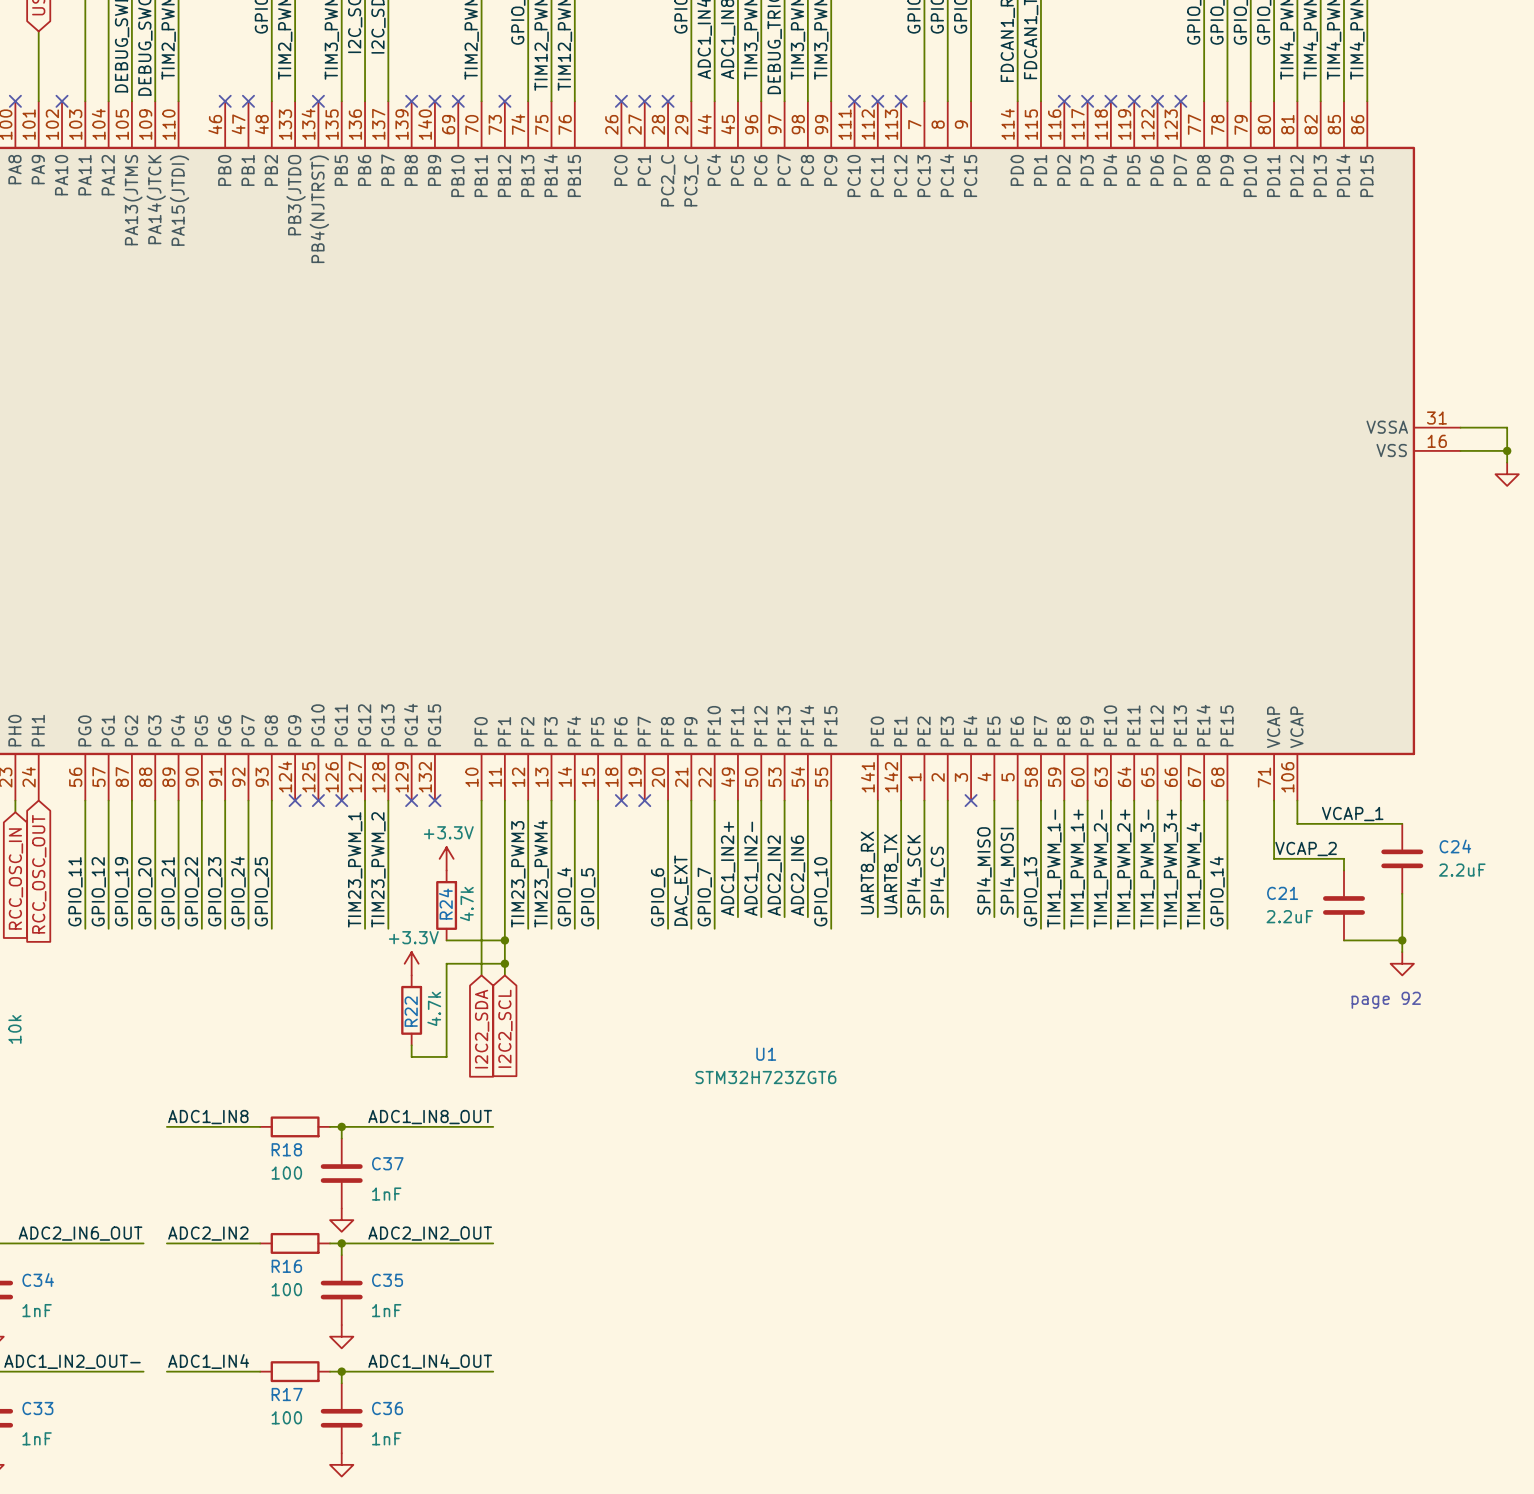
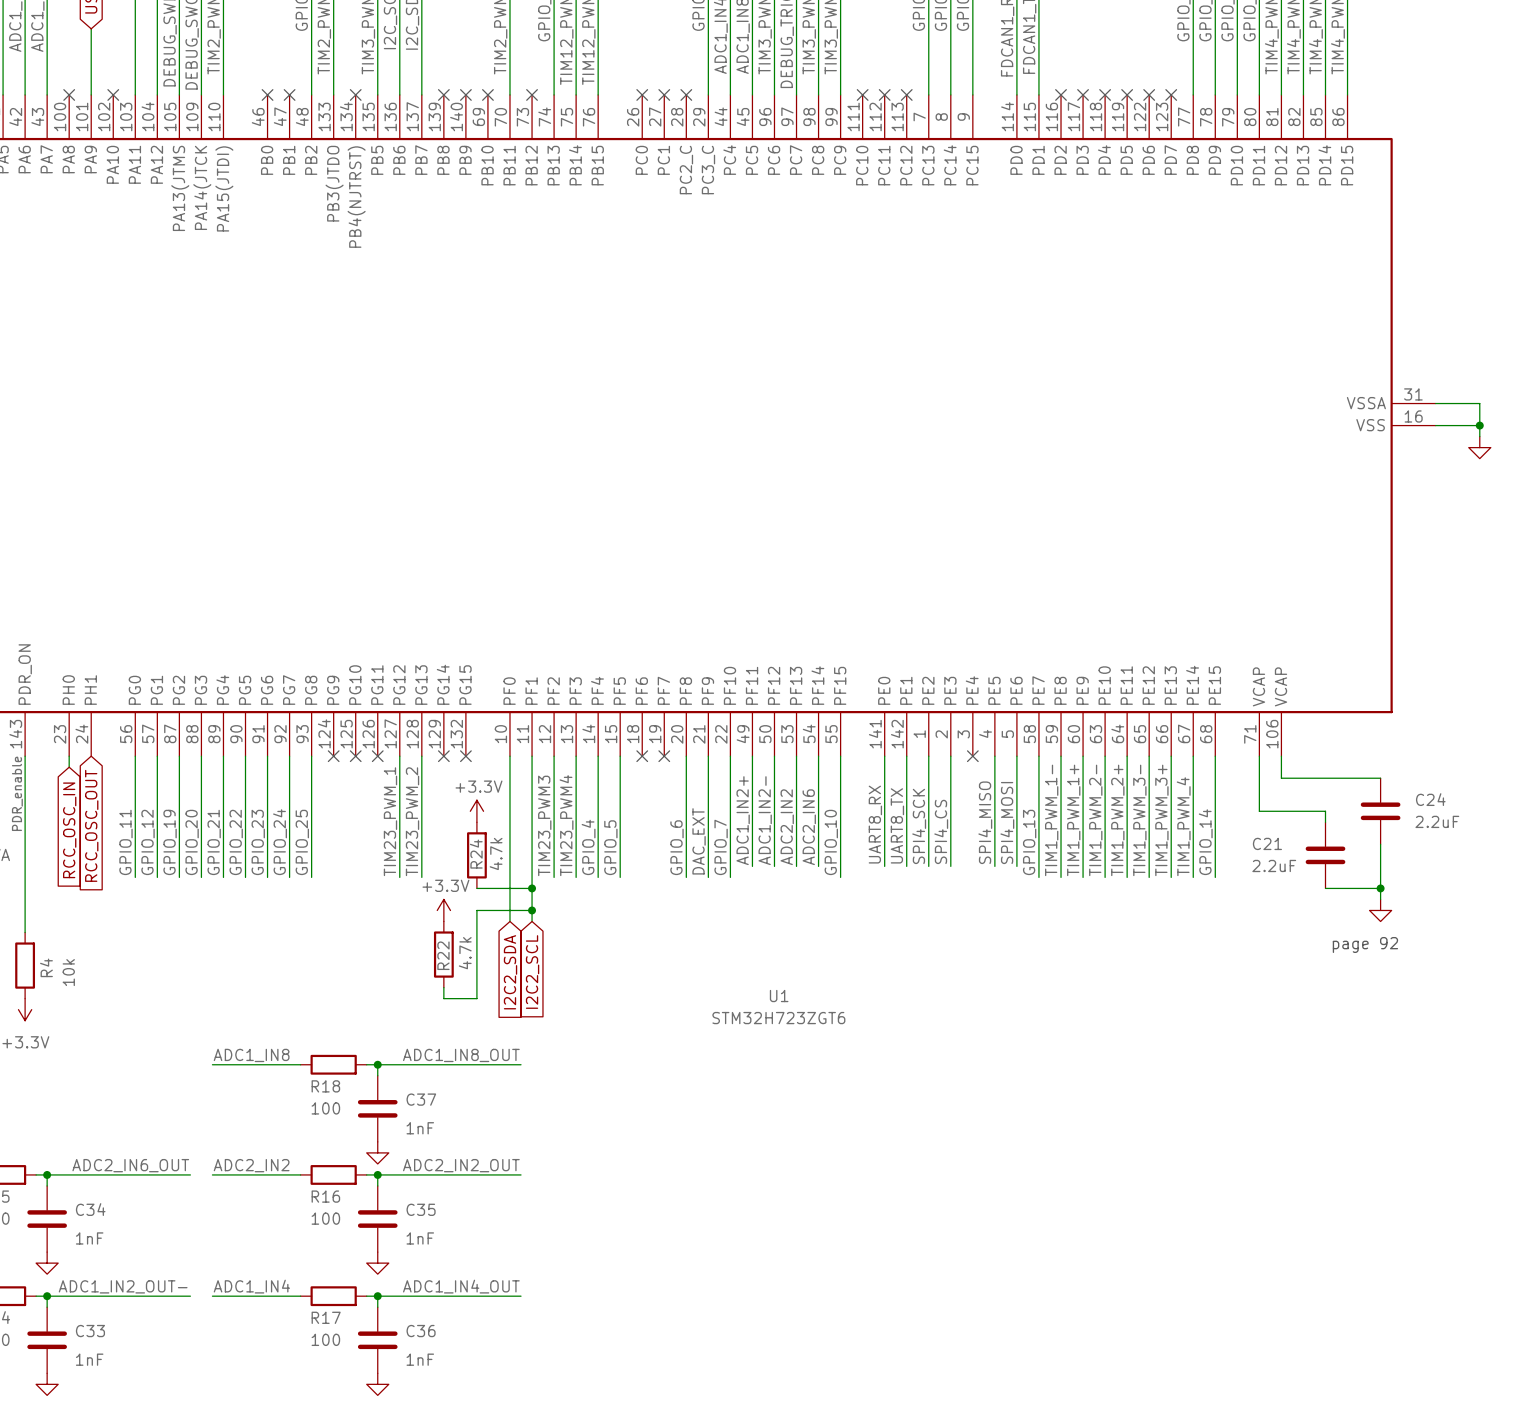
label: VCAP_1 (1352, 814) -> none
label: VCAP_2 (1306, 849) -> none

